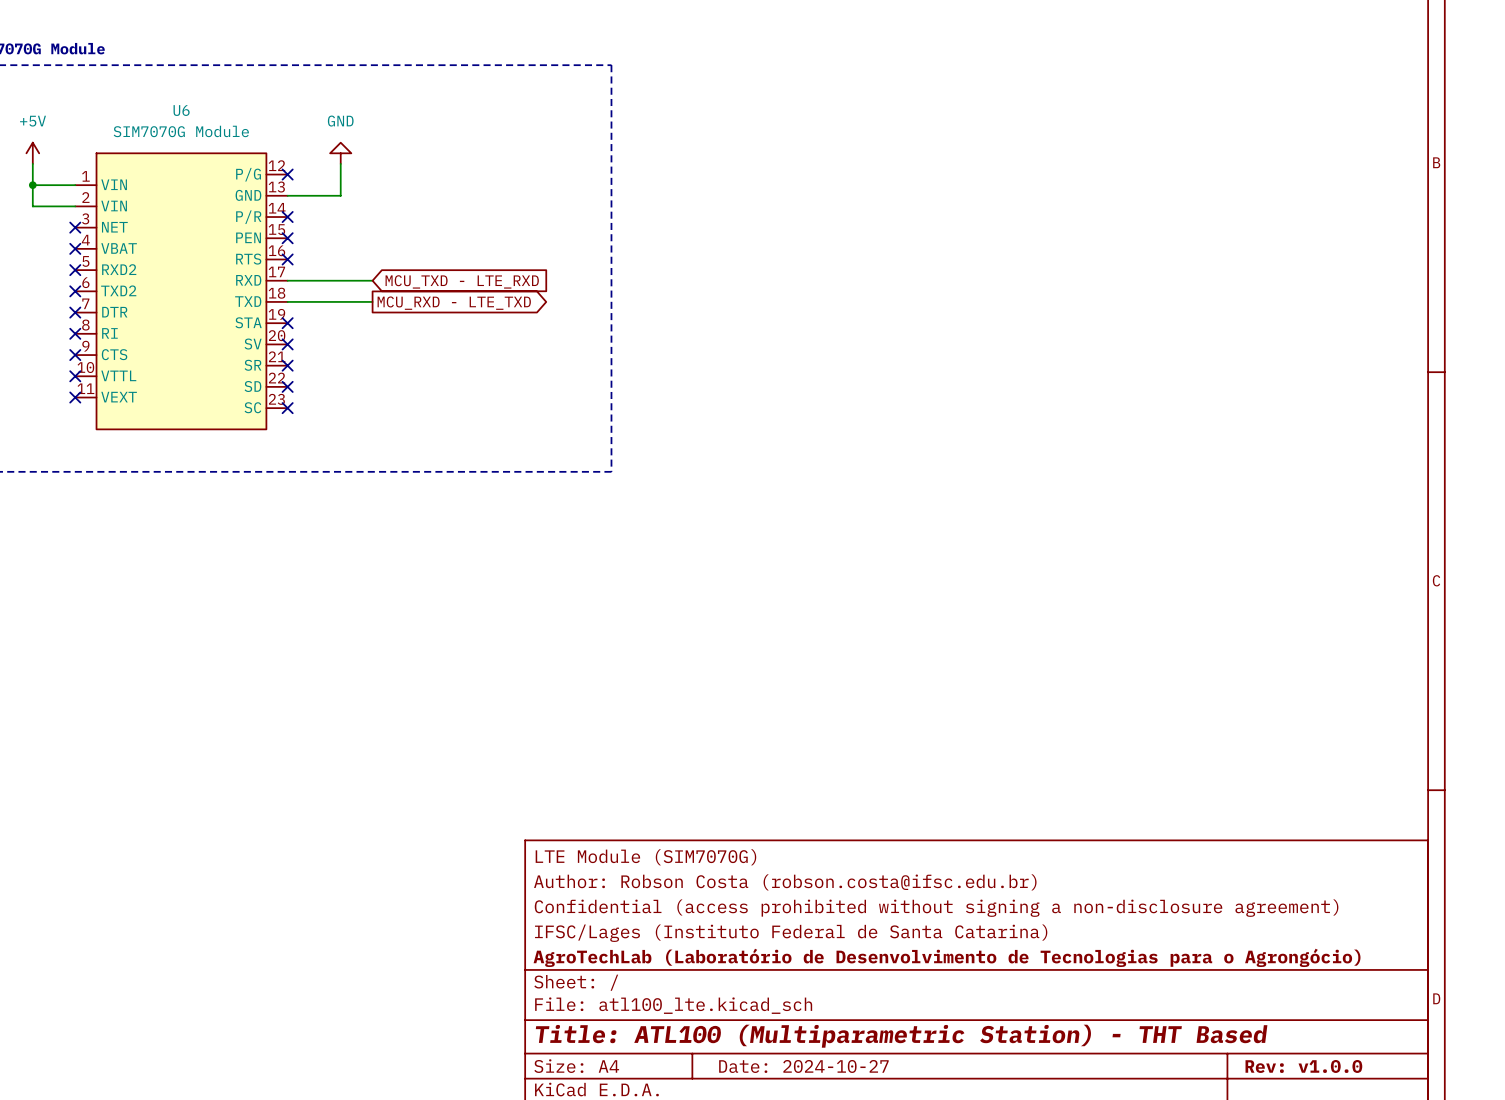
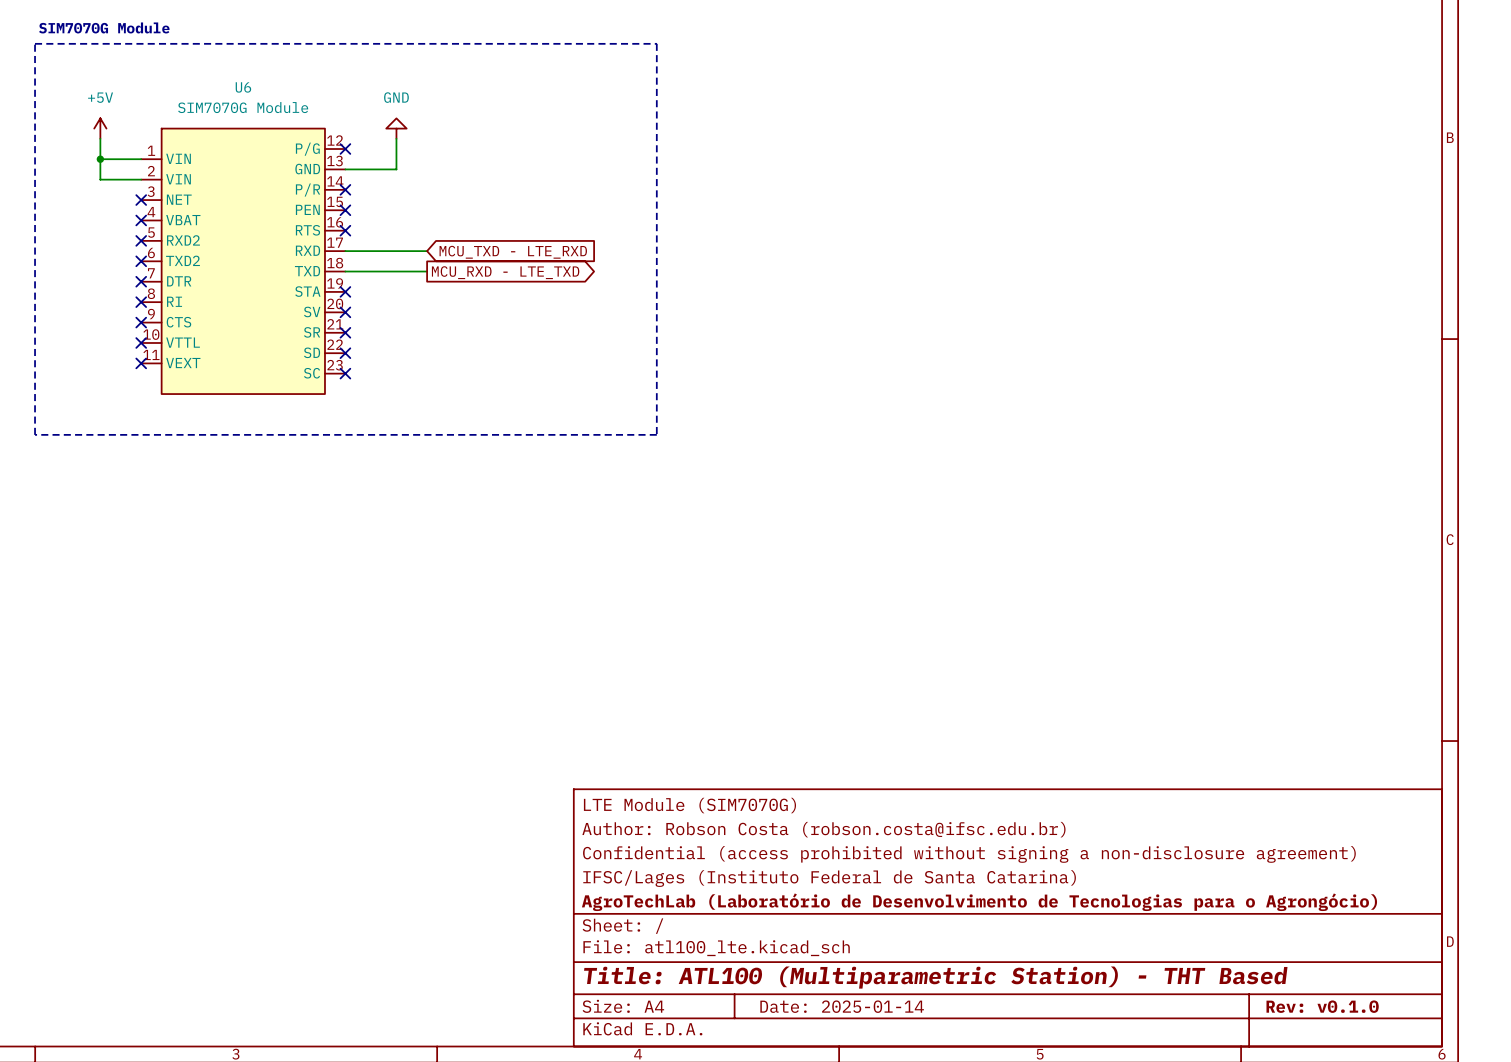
title block: Date: 2024-10-27 (803, 1066) -> Date: 2025-01-14 (842, 1006)
title block: Rev: v1.0.0 (1303, 1066) -> Rev: v0.1.0 (1322, 1006)

